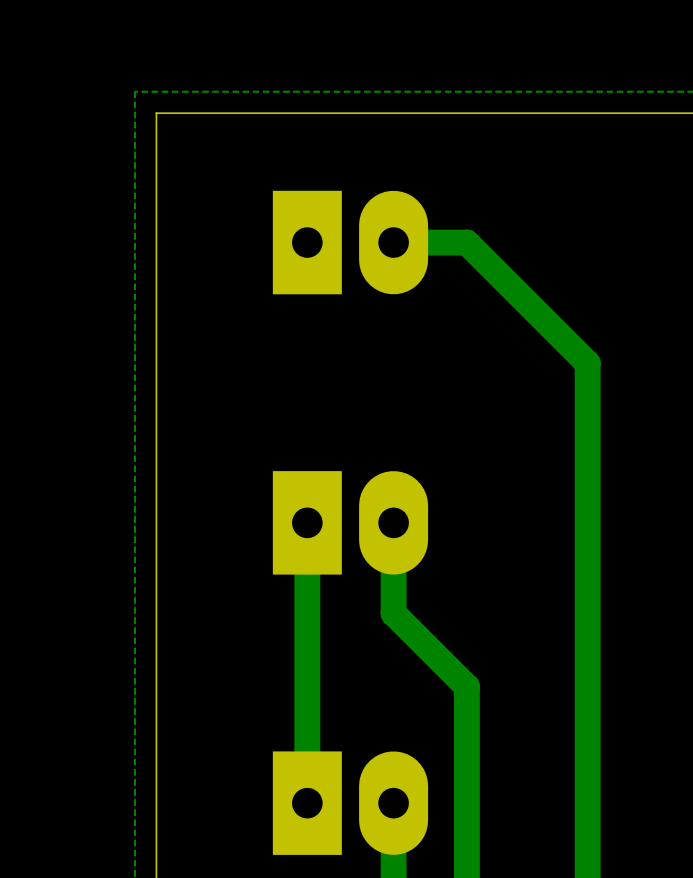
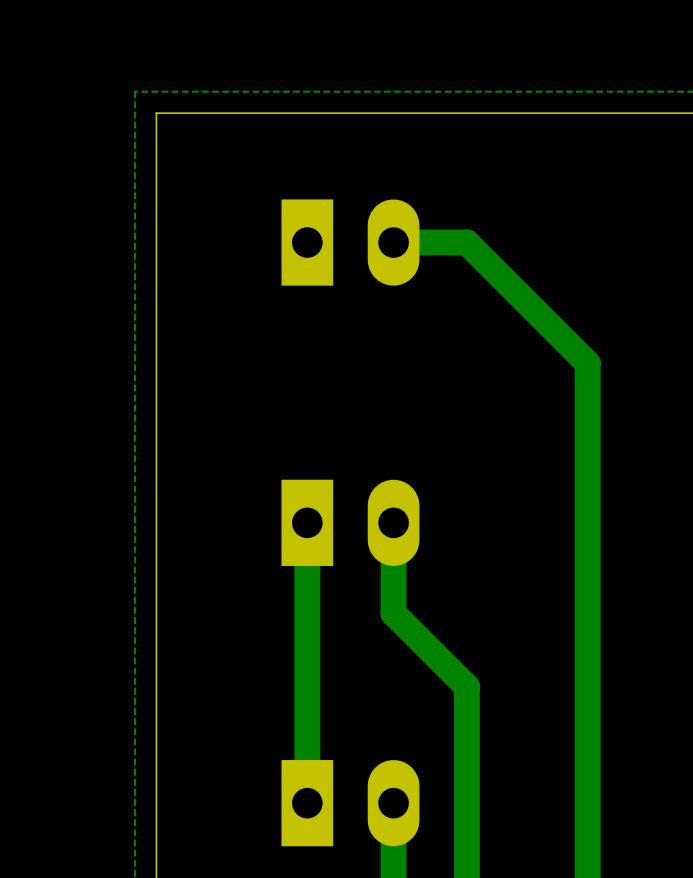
part footprint: [272, 190, 429, 295] -> [281, 199, 420, 286]
part footprint: [272, 471, 429, 575] -> [281, 479, 420, 566]
part footprint: [272, 751, 429, 855] -> [281, 760, 420, 847]

